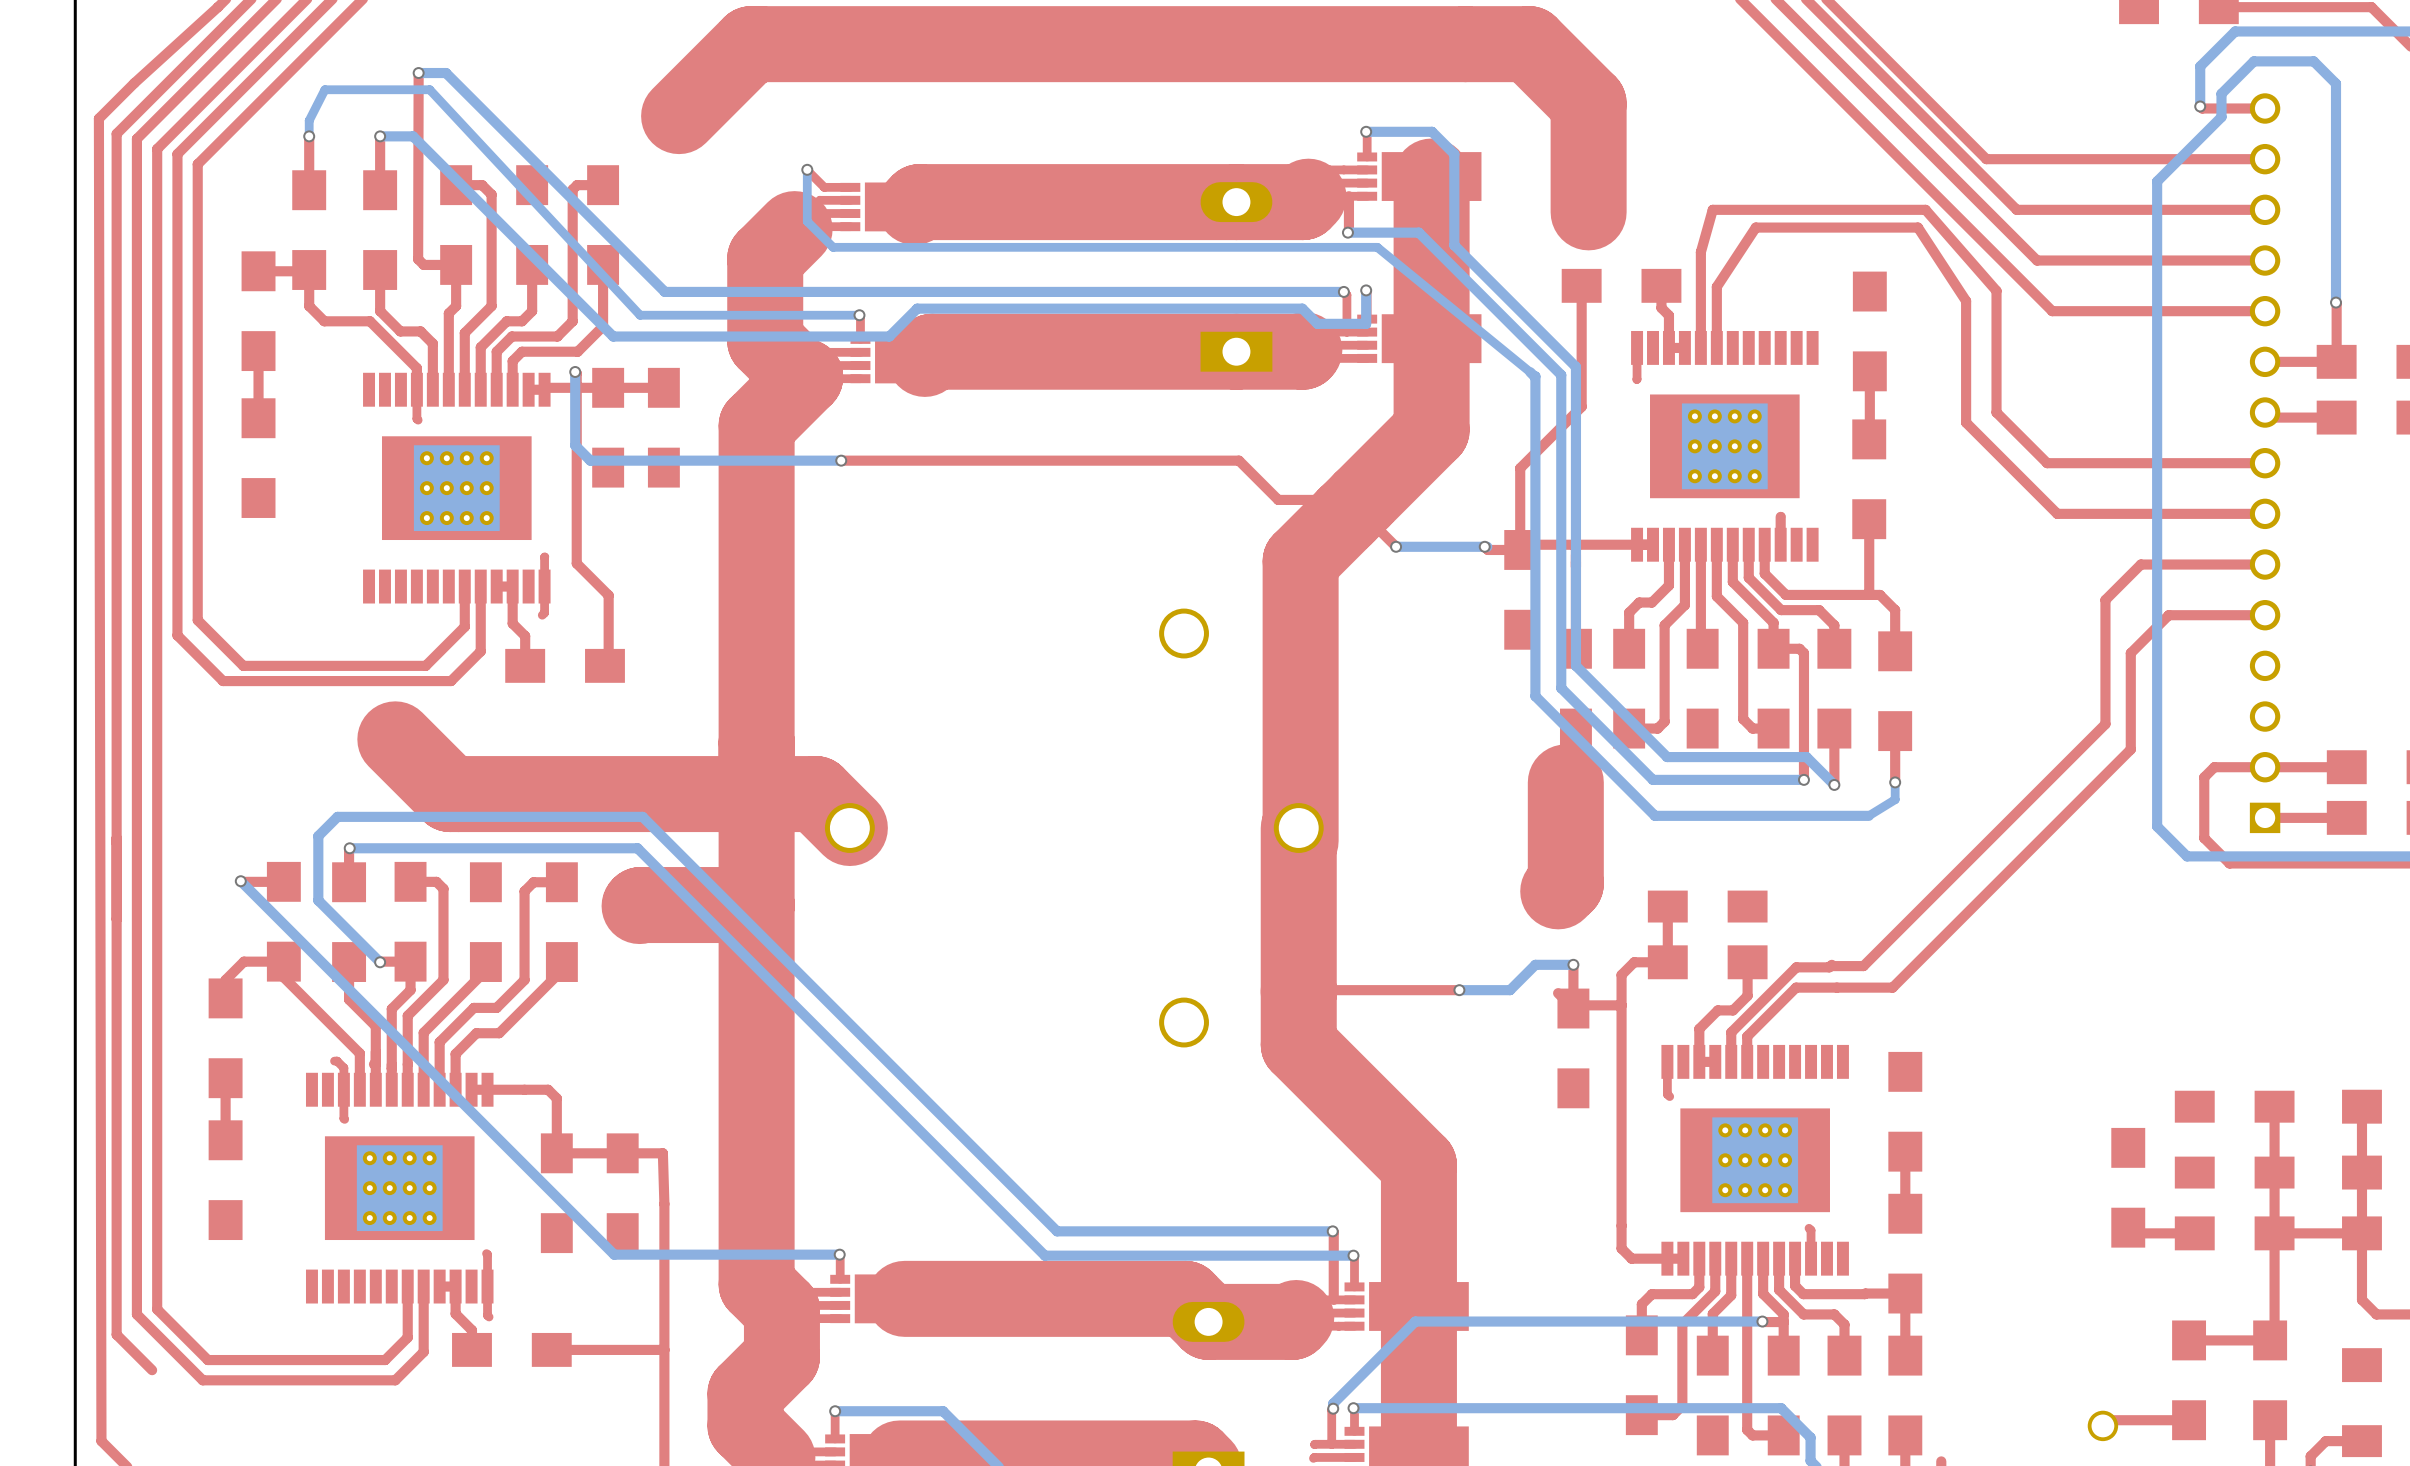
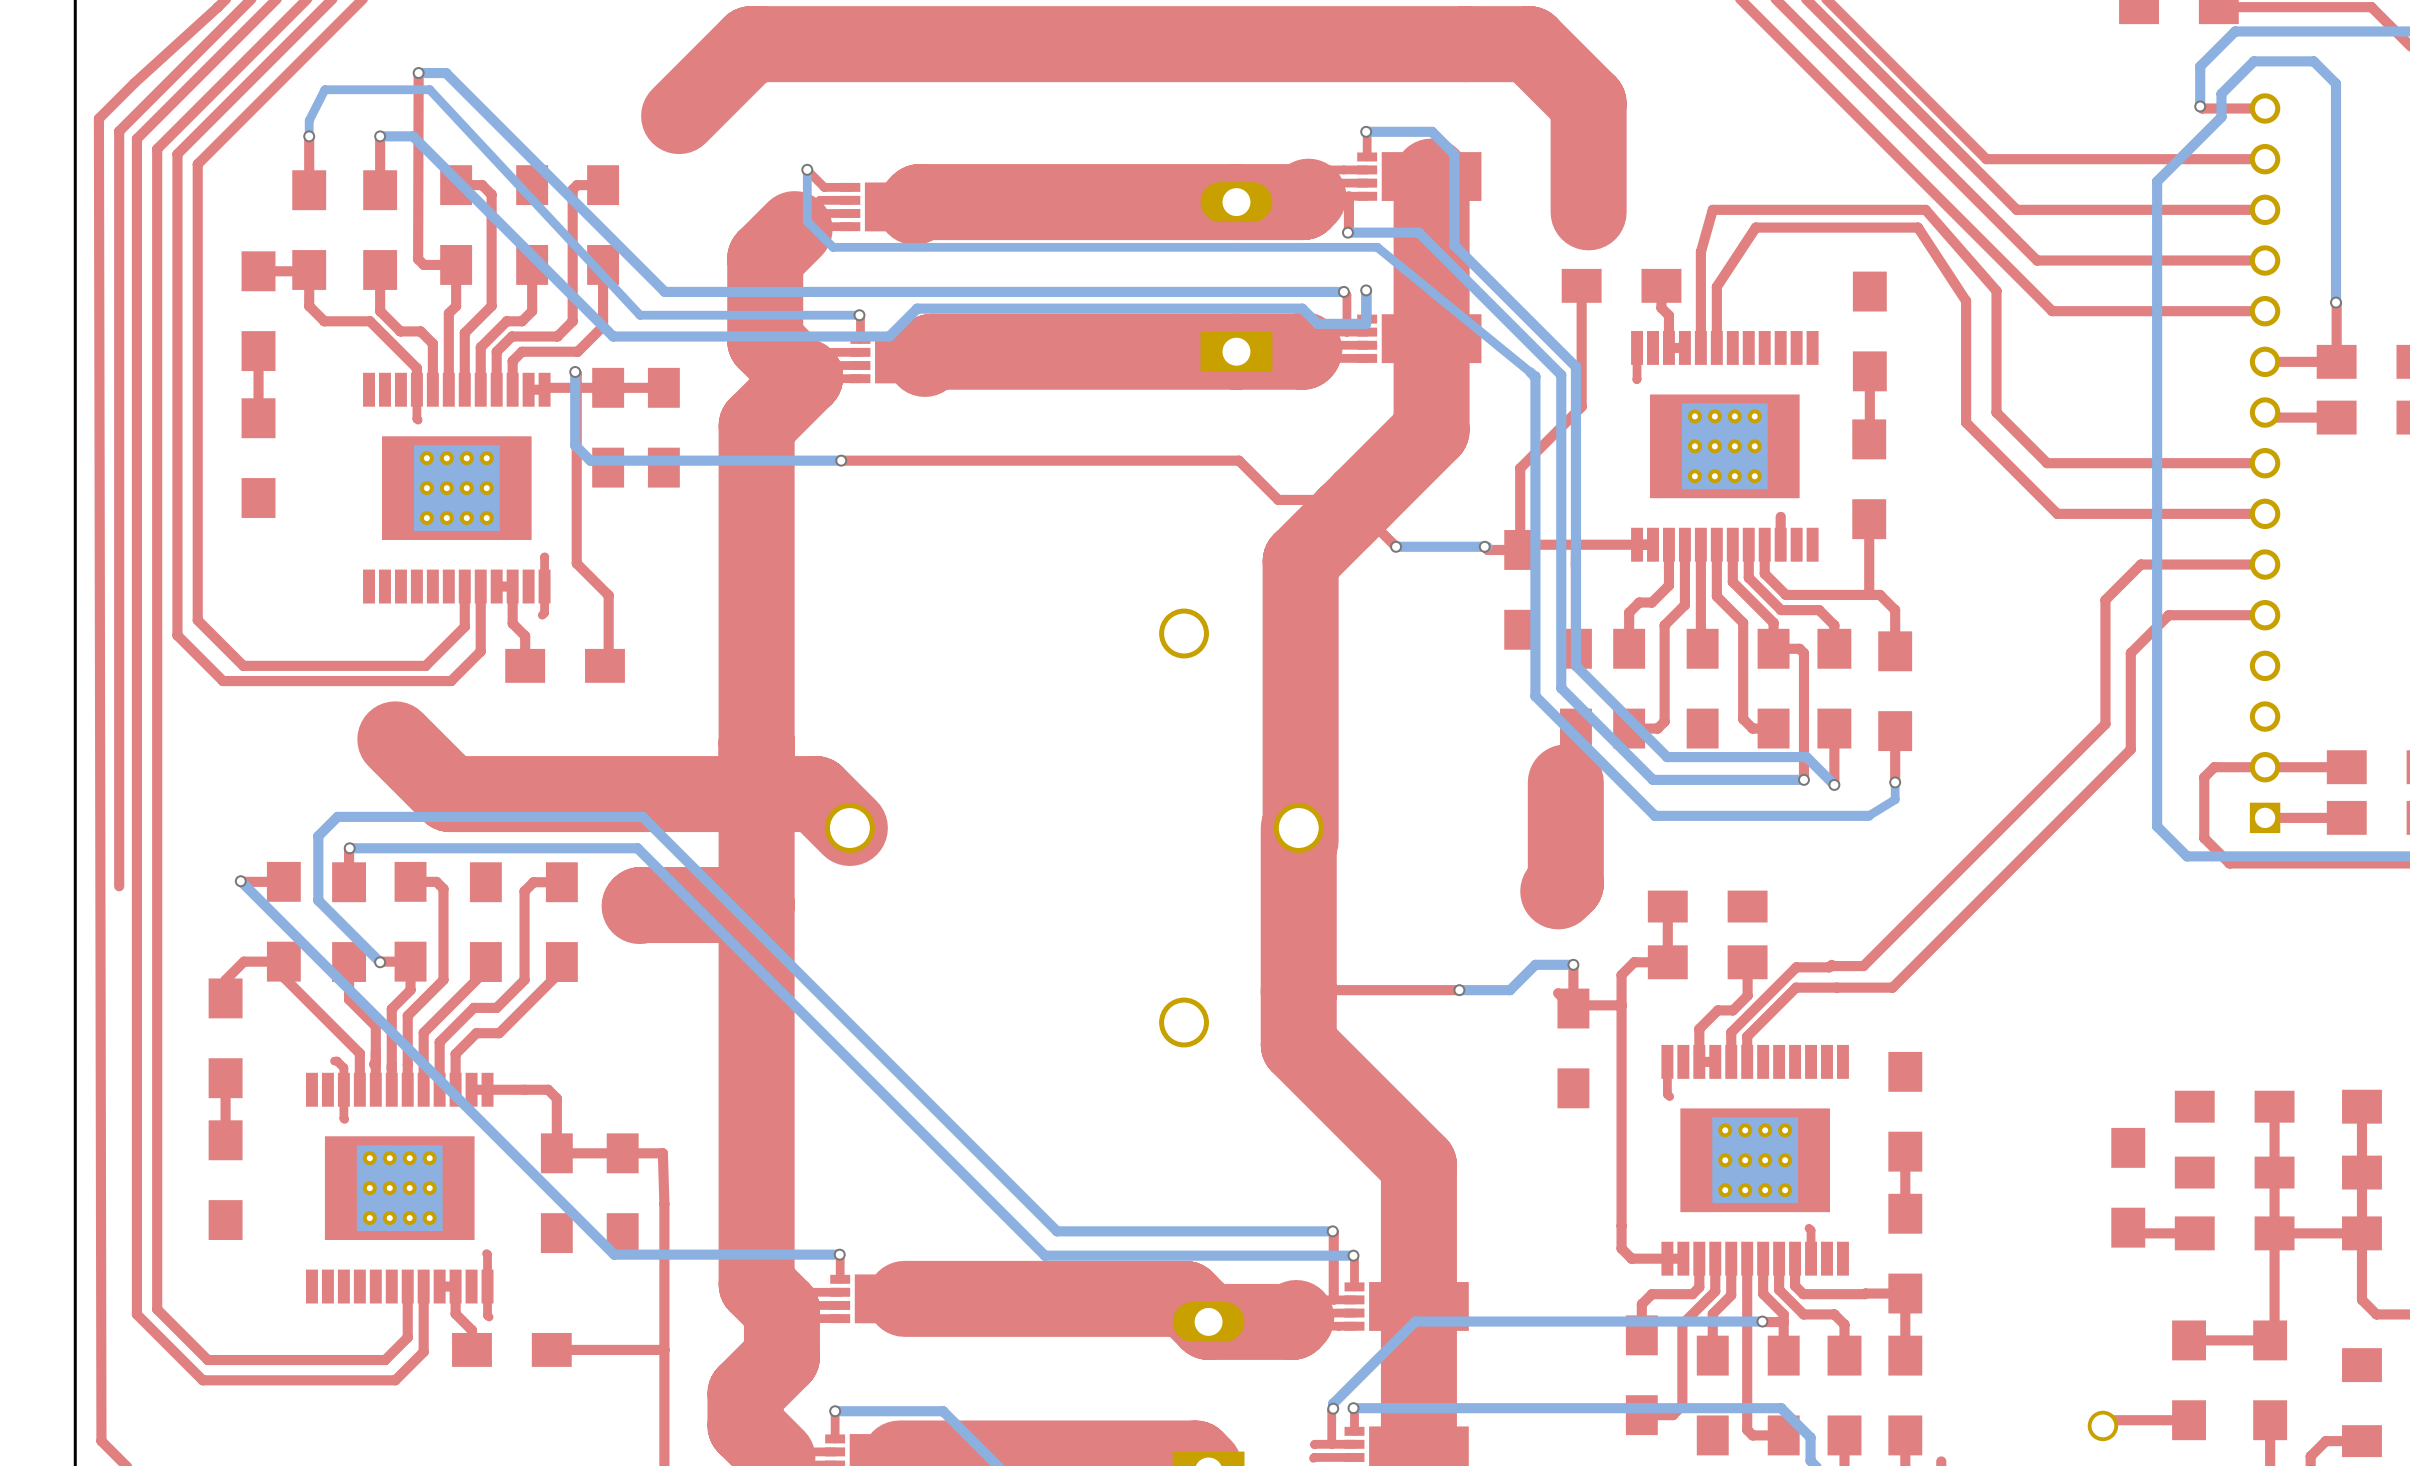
top track: (119, 131) (116, 133) (116, 1334) (152, 1370) -> (119, 131) (119, 886)

